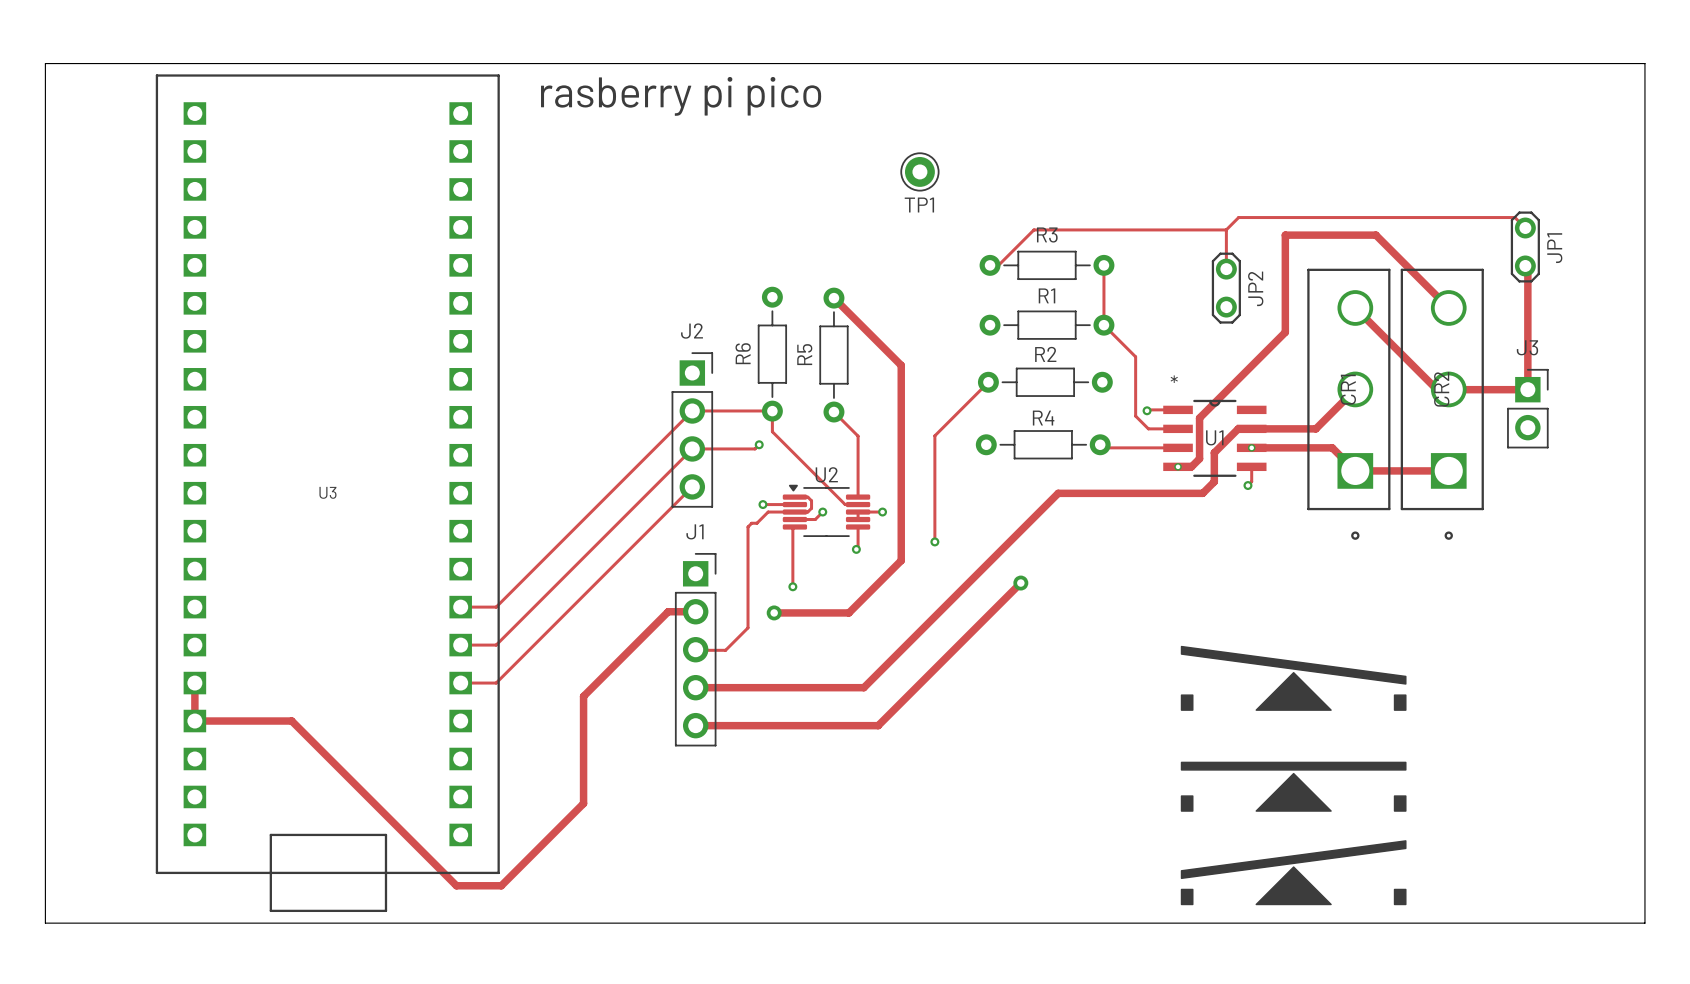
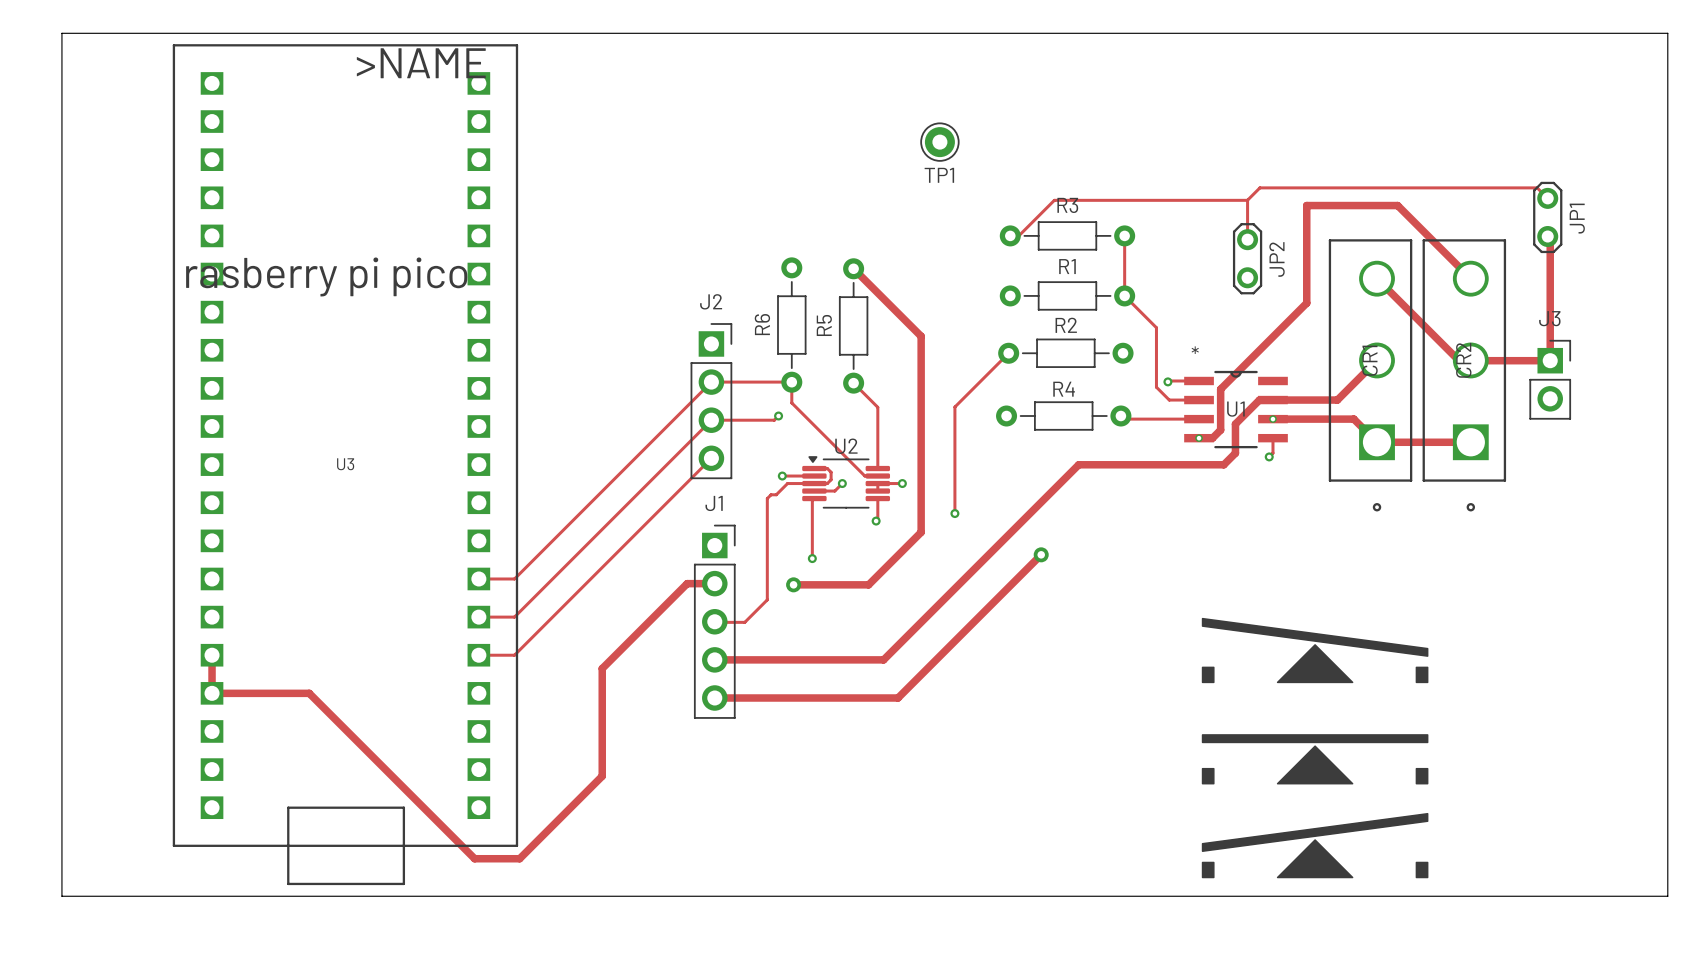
U3 text: none -> >NAME (421, 63)
U3 text position: rasberry pi pico (681, 96) -> rasberry pi pico (326, 276)

